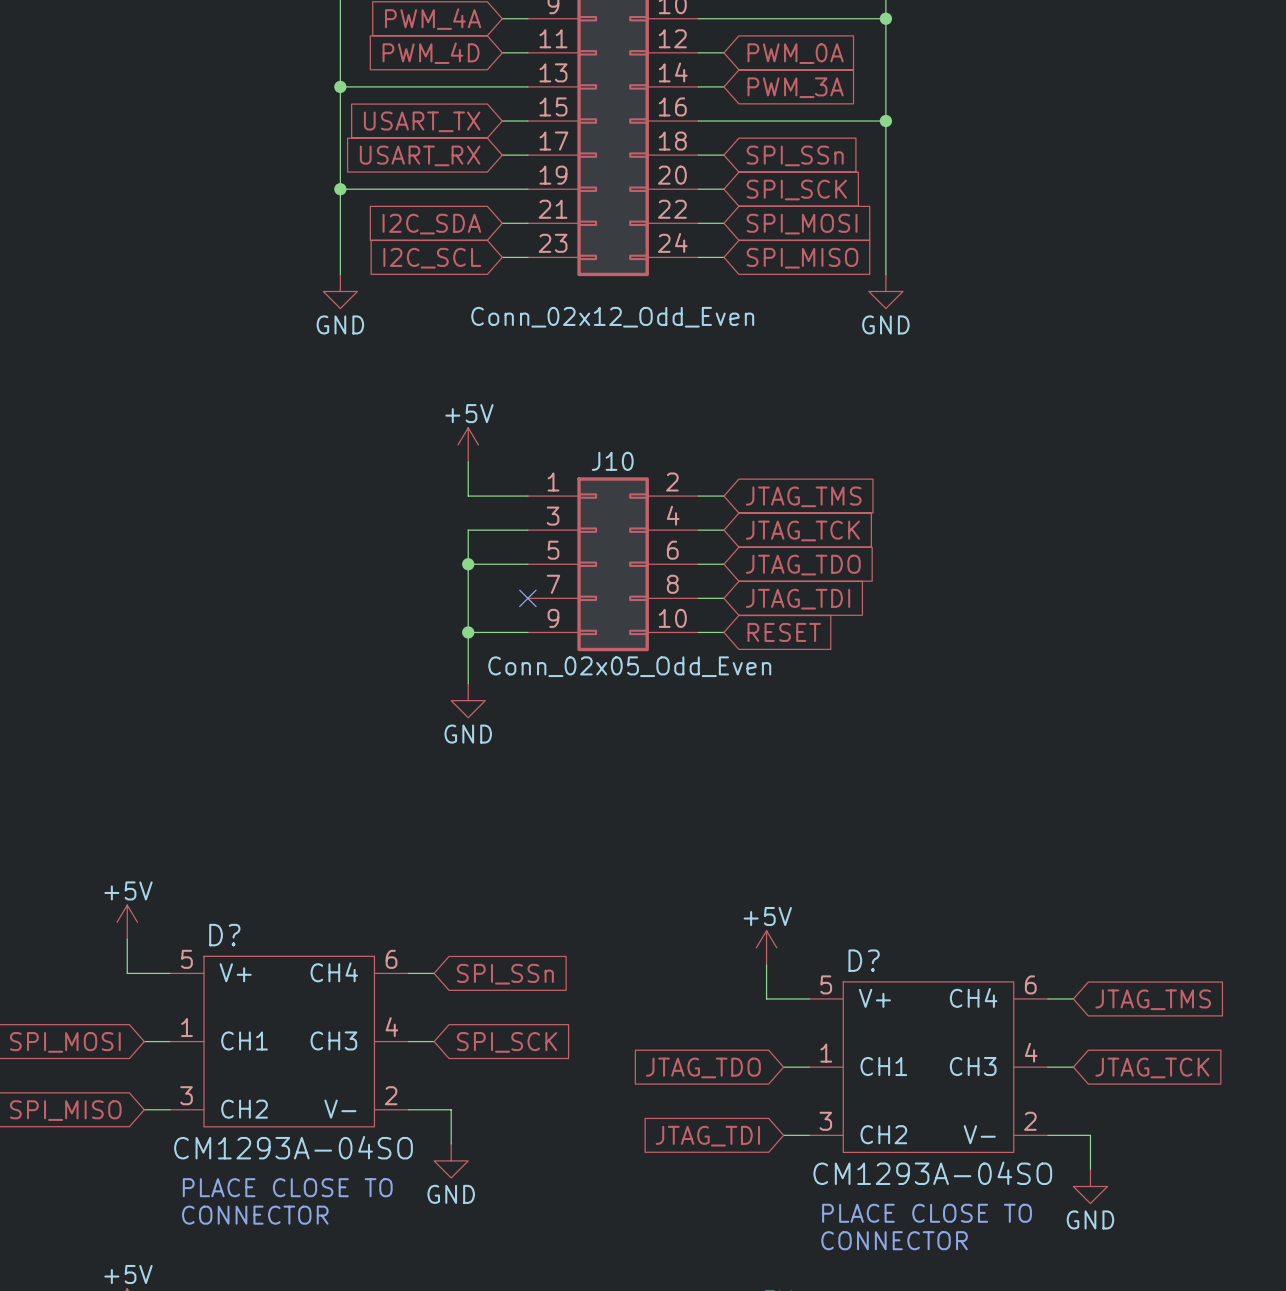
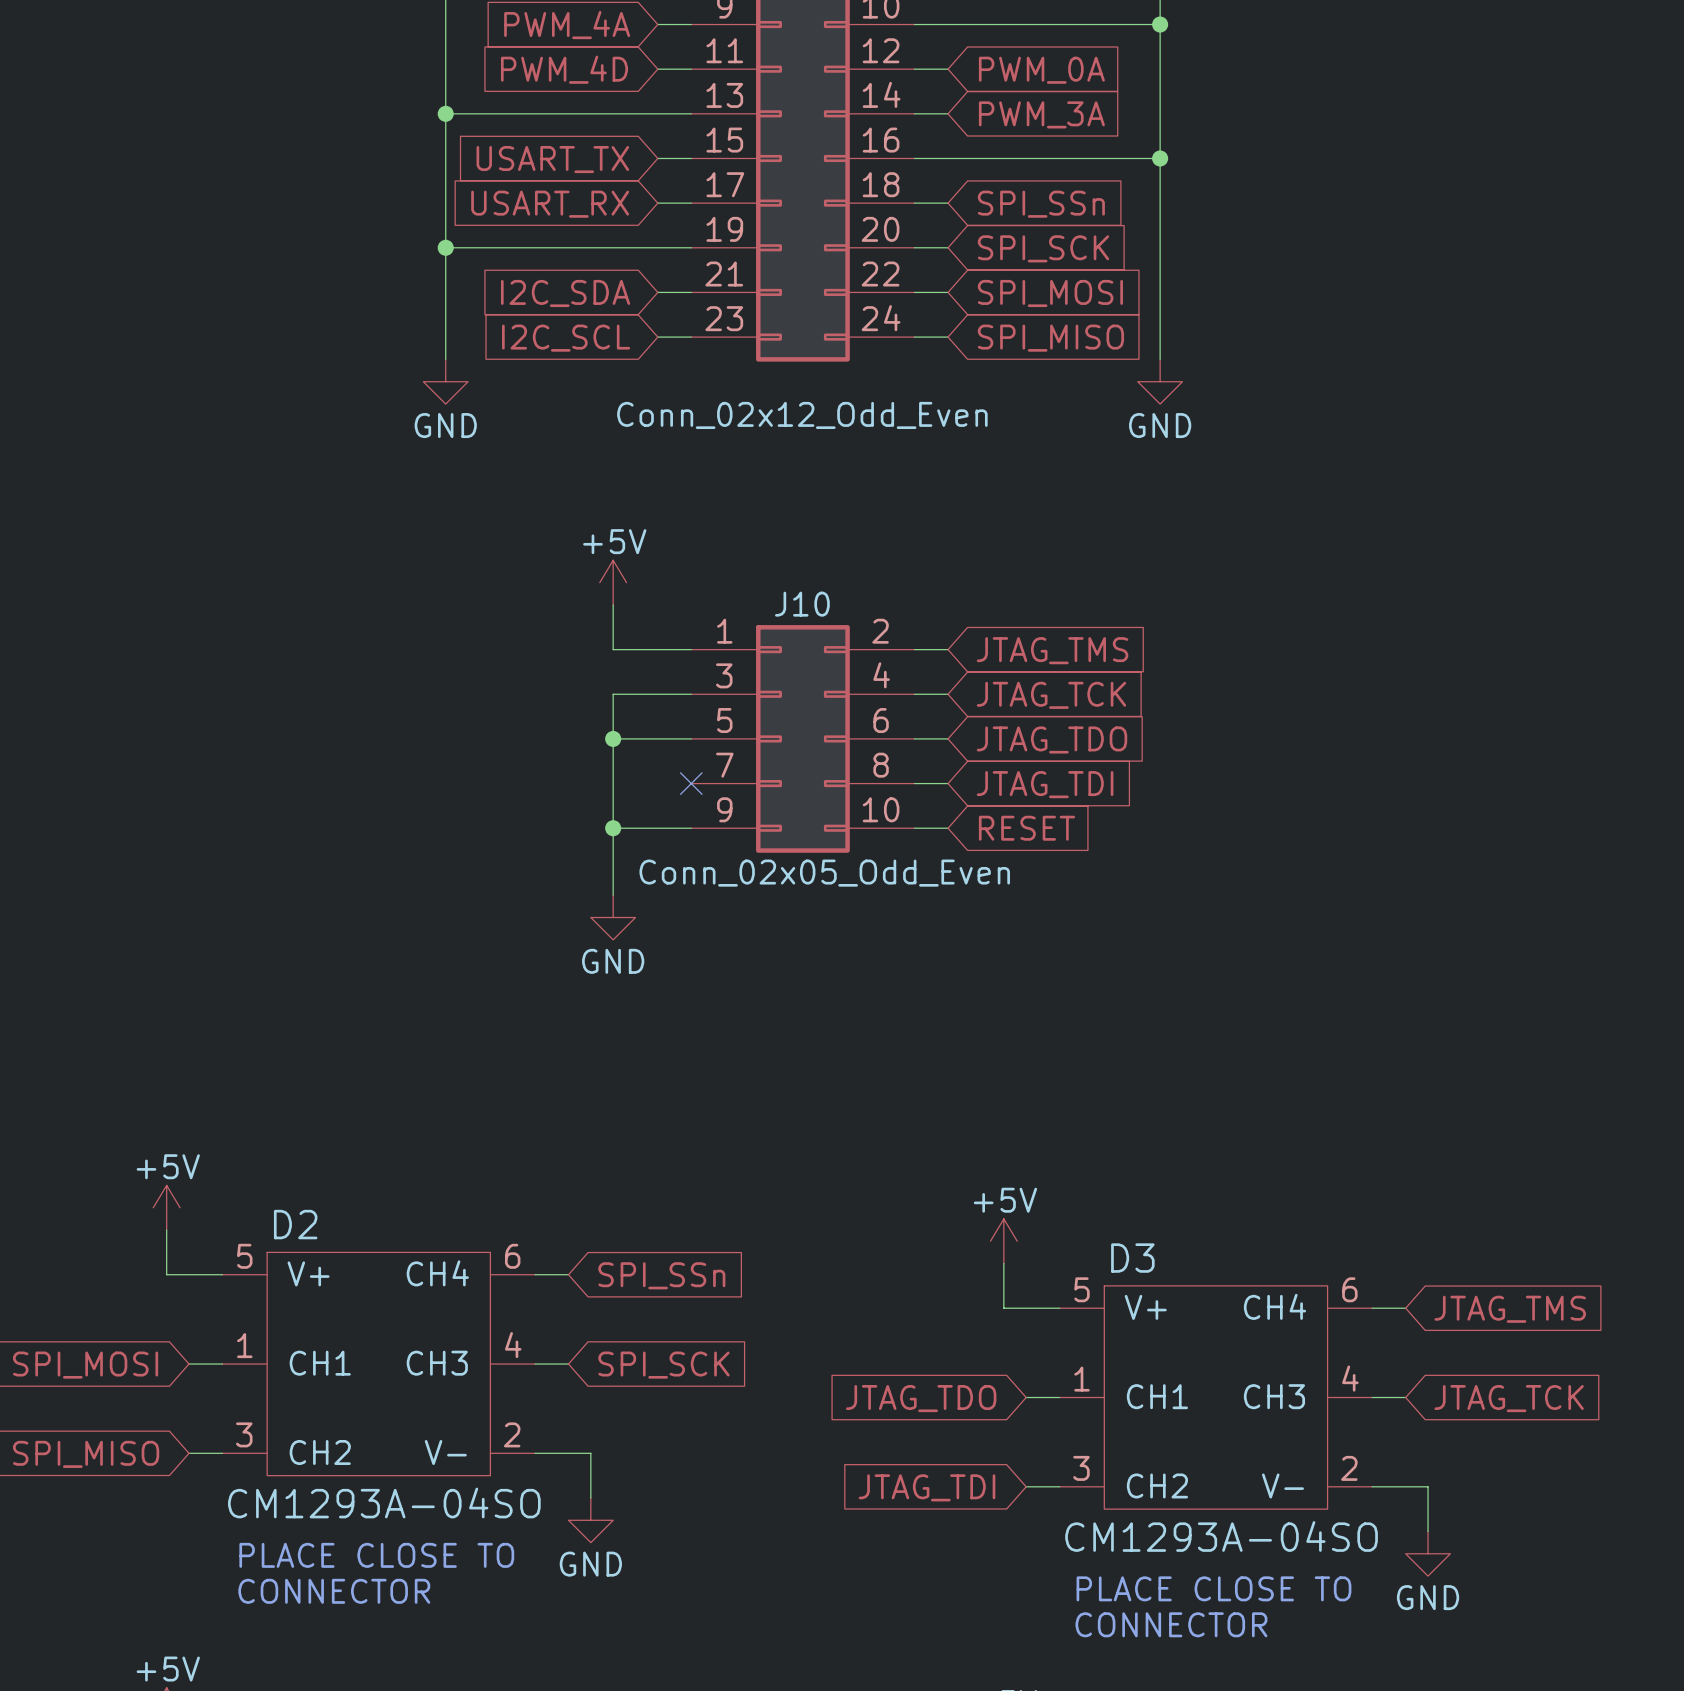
D? name: D? (224, 935) -> D2 (295, 1224)
D? name: D? (864, 960) -> D3 (1132, 1258)

